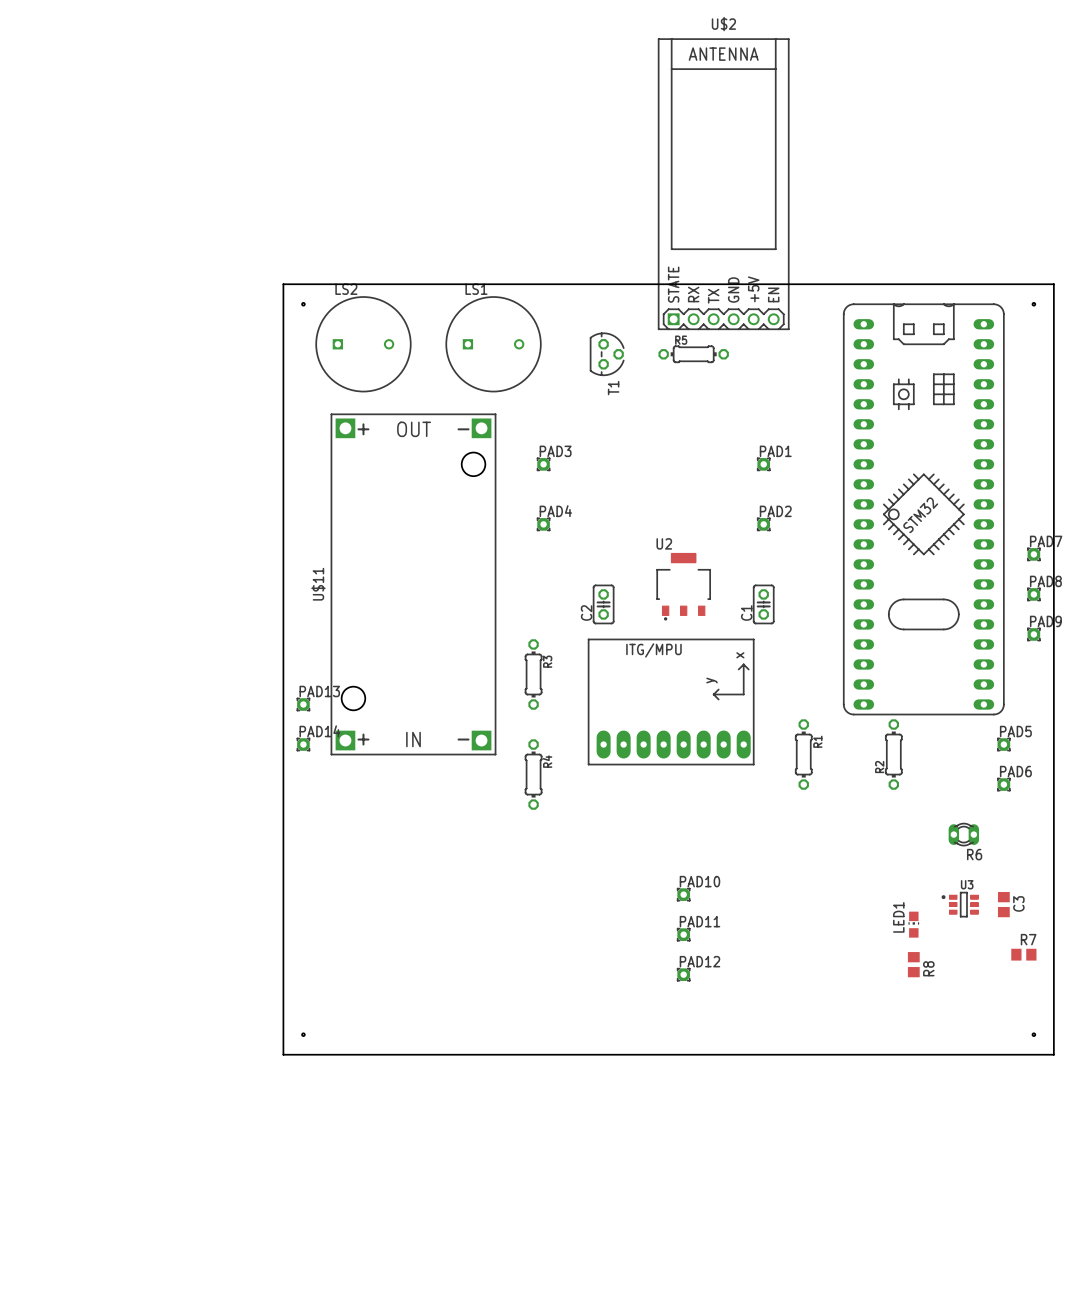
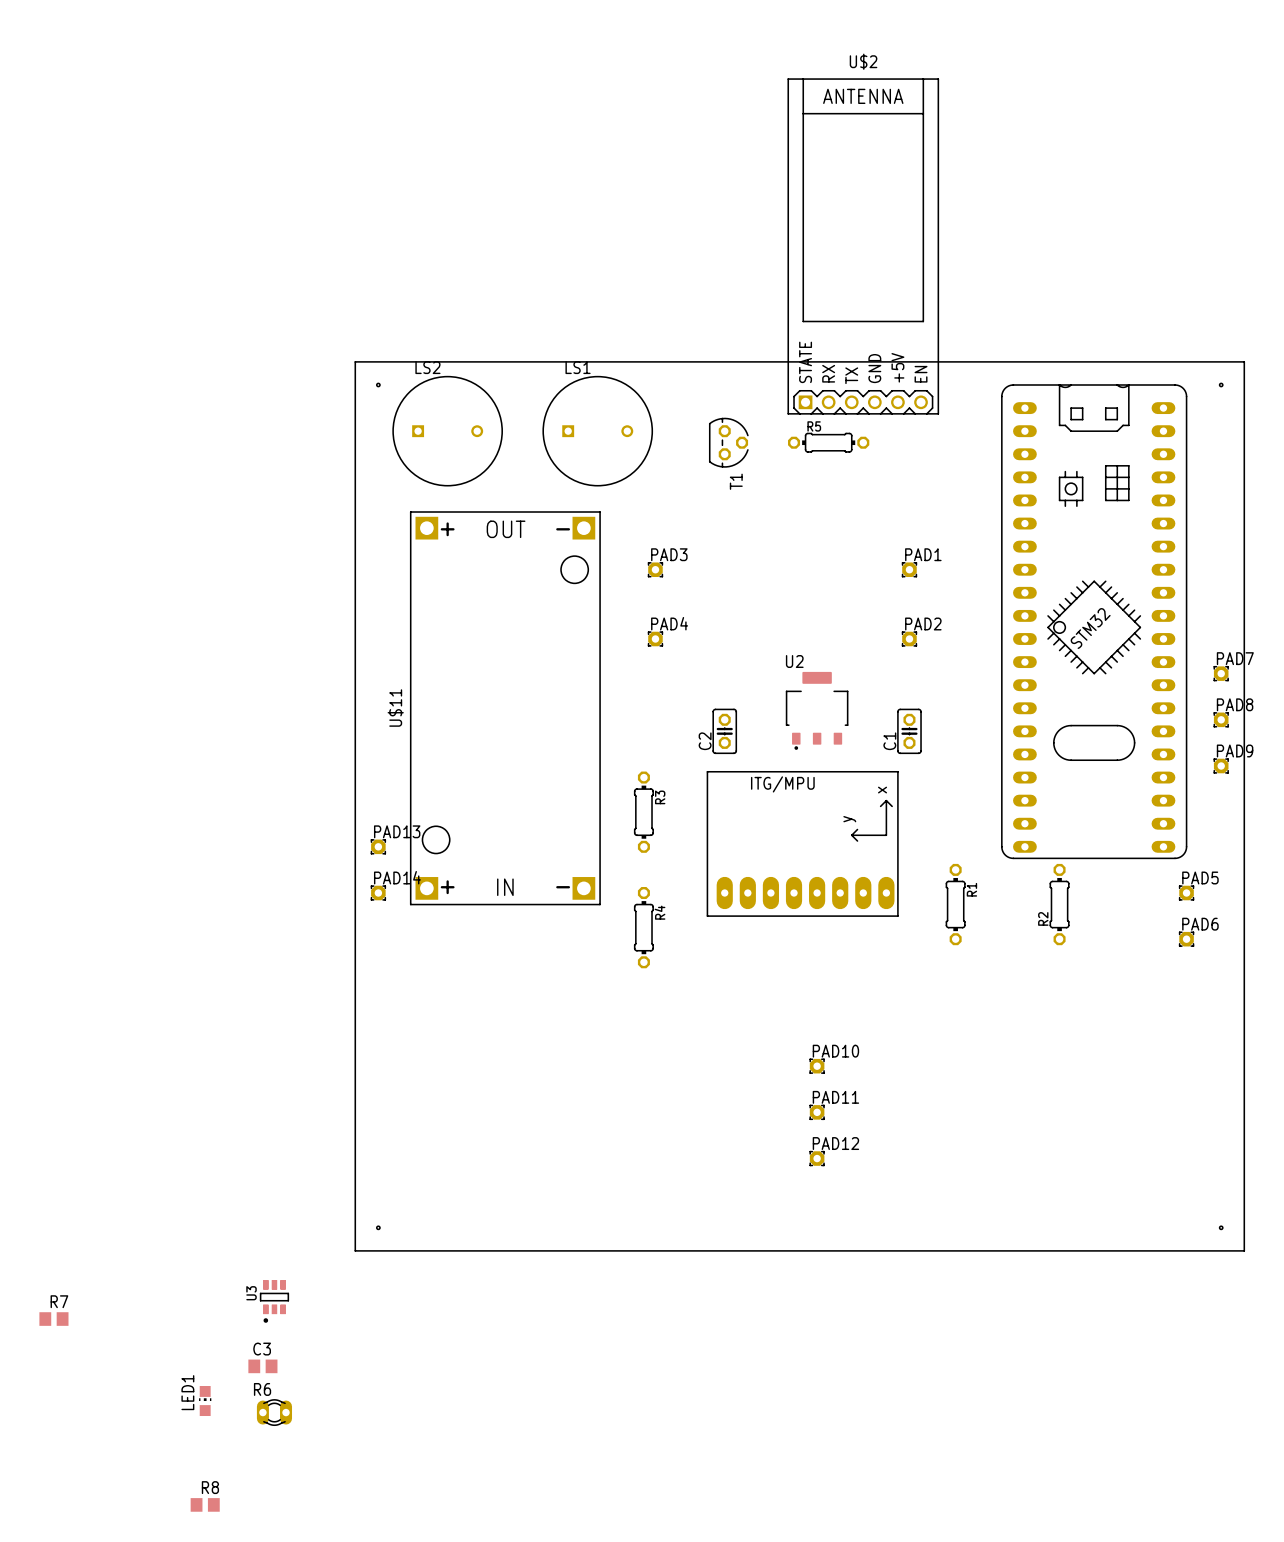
R6 position: (963, 834) -> (274, 1412)
R6 name position: R6 (974, 854) -> R6 (262, 1389)
C3 name position: C3 (1018, 903) -> C3 (262, 1349)
U3 rotation: 0° (960, 904) -> 90° counterclockwise (274, 1301)
U3 position: (960, 904) -> (274, 1301)
C3 rotation: 0° (1003, 904) -> 90° clockwise (262, 1366)
C3 position: (1003, 904) -> (262, 1366)
LED1 position: (913, 924) -> (205, 1401)
R7 position: (1023, 954) -> (53, 1319)
R8 rotation: 0° (913, 964) -> 90° clockwise (205, 1504)
R8 position: (913, 964) -> (205, 1504)
R8 name position: R8 (928, 968) -> R8 (210, 1487)

